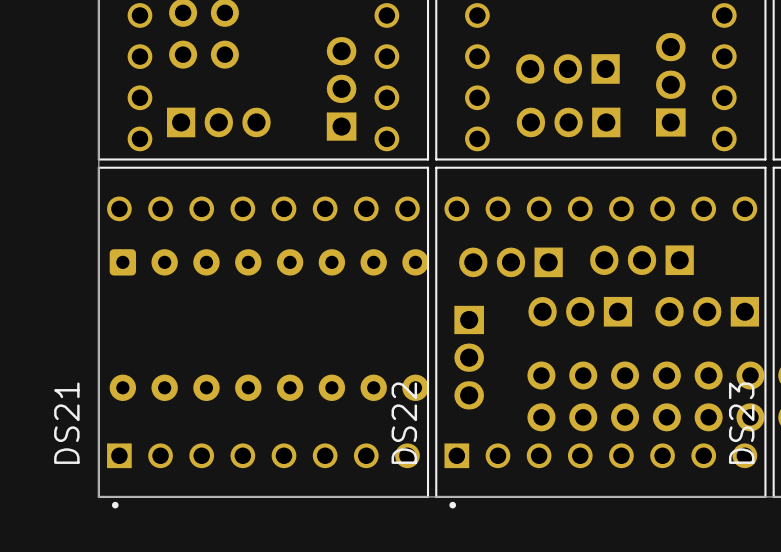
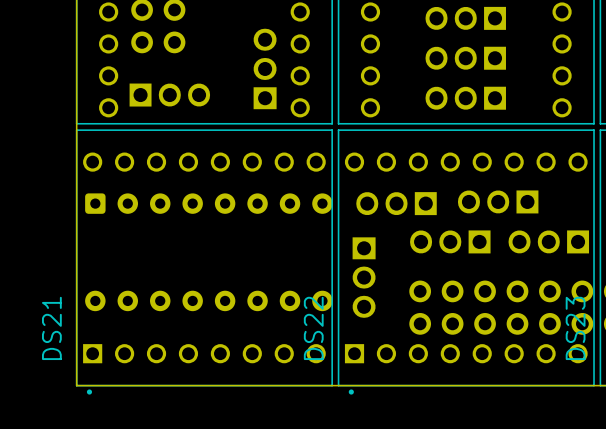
part: none -> (465, 18)
part: (567, 68) -> none
part: none -> (465, 58)
part: (670, 84) -> none
part: (568, 122) -> none
part: none -> (465, 98)

